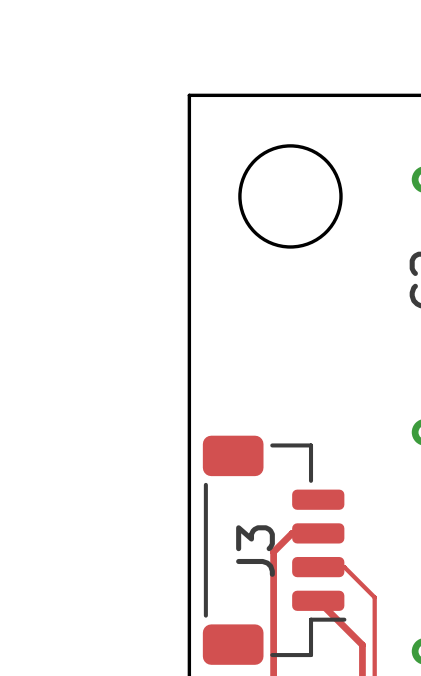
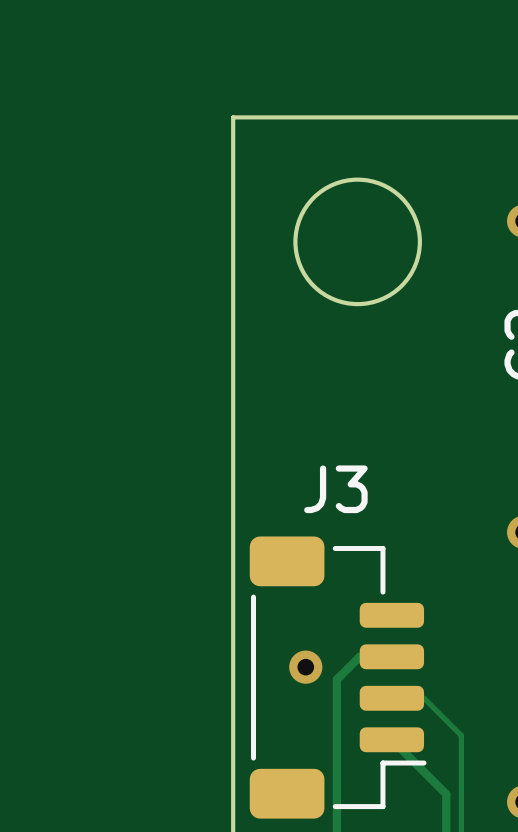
via: none -> (305, 667)
J3 name rotation: 0° (255, 551) -> 90° clockwise (335, 489)
J3 name position: J3 (255, 551) -> J3 (335, 489)

